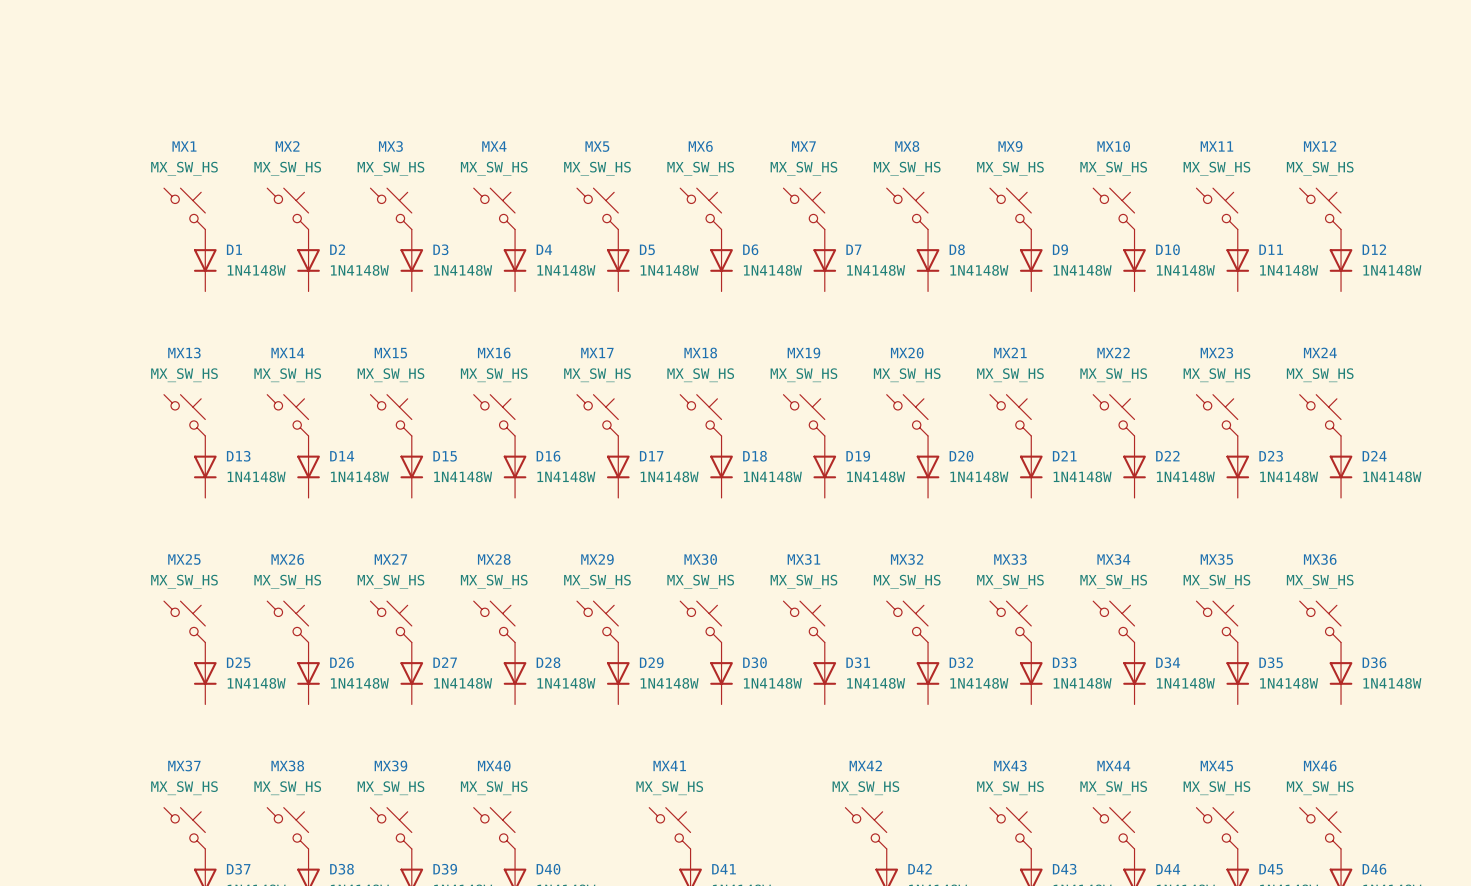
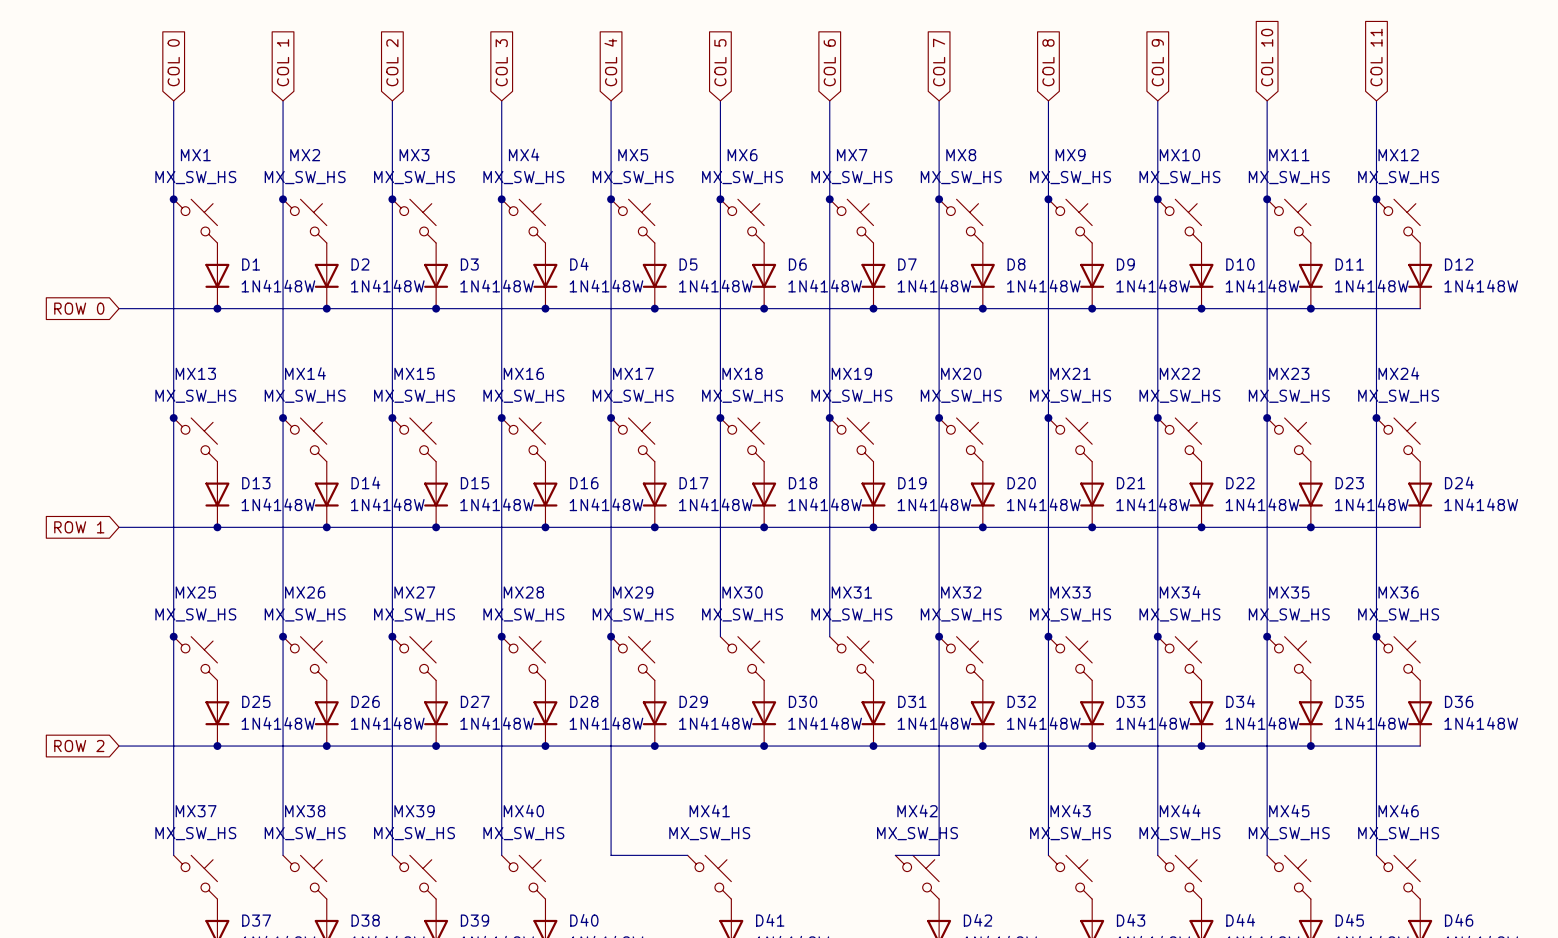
global label: none -> COL 10 (1267, 57)
global label: none -> COL 11 (1376, 57)
global label: none -> COL 0 (173, 62)
global label: none -> COL 1 (283, 62)
global label: none -> COL 2 (392, 62)
global label: none -> COL 3 (501, 62)
global label: none -> COL 4 (610, 62)
global label: none -> COL 5 (720, 62)
global label: none -> COL 6 (829, 62)
global label: none -> COL 7 (939, 62)
global label: none -> COL 8 (1048, 62)
global label: none -> COL 9 (1157, 62)
wire: none -> (173, 100) (173, 855)
wire: none -> (283, 100) (283, 855)
wire: none -> (392, 100) (392, 855)
wire: none -> (501, 100) (501, 855)
wire: none -> (611, 100) (611, 855) (687, 855)
wire: none -> (720, 100) (720, 636)
wire: none -> (829, 100) (829, 636)
wire: none -> (939, 100) (939, 855) (895, 855)
wire: none -> (1048, 100) (1048, 855)
wire: none -> (1157, 100) (1157, 855)
wire: none -> (1267, 100) (1267, 855)
wire: none -> (1376, 100) (1376, 855)
junction: none -> (173, 199)
junction: none -> (283, 199)
junction: none -> (392, 199)
junction: none -> (501, 199)
junction: none -> (611, 199)
junction: none -> (720, 199)
junction: none -> (829, 199)
junction: none -> (939, 199)
junction: none -> (1048, 199)
junction: none -> (1157, 199)
junction: none -> (1267, 199)
junction: none -> (1376, 199)
global label: none -> ROW 0 (79, 308)
wire: none -> (119, 308) (1420, 308)
junction: none -> (217, 308)
junction: none -> (326, 308)
junction: none -> (436, 308)
junction: none -> (545, 308)
junction: none -> (654, 308)
junction: none -> (764, 308)
junction: none -> (873, 308)
junction: none -> (982, 308)
junction: none -> (1092, 308)
junction: none -> (1201, 308)
junction: none -> (1310, 308)
junction: none -> (173, 417)
junction: none -> (283, 417)
junction: none -> (392, 417)
junction: none -> (501, 417)
junction: none -> (611, 417)
junction: none -> (720, 417)
junction: none -> (829, 417)
junction: none -> (939, 417)
junction: none -> (1048, 417)
junction: none -> (1157, 417)
junction: none -> (1267, 417)
junction: none -> (1376, 417)
global label: none -> ROW 1 (79, 527)
wire: none -> (119, 527) (1420, 527)
junction: none -> (217, 527)
junction: none -> (326, 527)
junction: none -> (436, 527)
junction: none -> (545, 527)
junction: none -> (654, 527)
junction: none -> (764, 527)
junction: none -> (873, 527)
junction: none -> (982, 527)
junction: none -> (1092, 527)
junction: none -> (1201, 527)
junction: none -> (1310, 527)
junction: none -> (173, 636)
junction: none -> (283, 636)
junction: none -> (392, 636)
junction: none -> (501, 636)
junction: none -> (611, 636)
junction: none -> (939, 636)
junction: none -> (1048, 636)
junction: none -> (1157, 636)
junction: none -> (1267, 636)
junction: none -> (1376, 636)
global label: none -> ROW 2 (79, 746)
wire: none -> (119, 746) (1420, 746)
junction: none -> (217, 746)
junction: none -> (326, 746)
junction: none -> (436, 746)
junction: none -> (545, 746)
junction: none -> (654, 746)
junction: none -> (764, 746)
junction: none -> (873, 746)
junction: none -> (982, 746)
junction: none -> (1092, 746)
junction: none -> (1201, 746)
junction: none -> (1310, 746)

